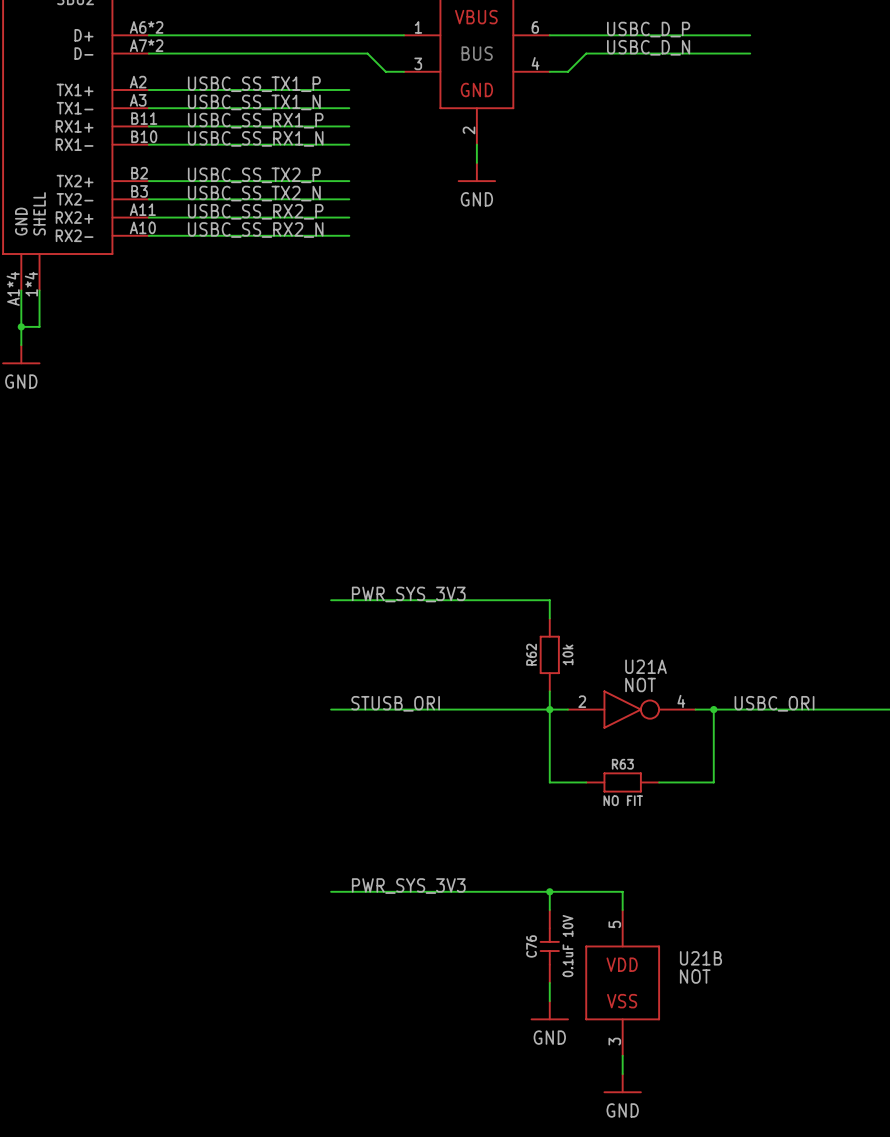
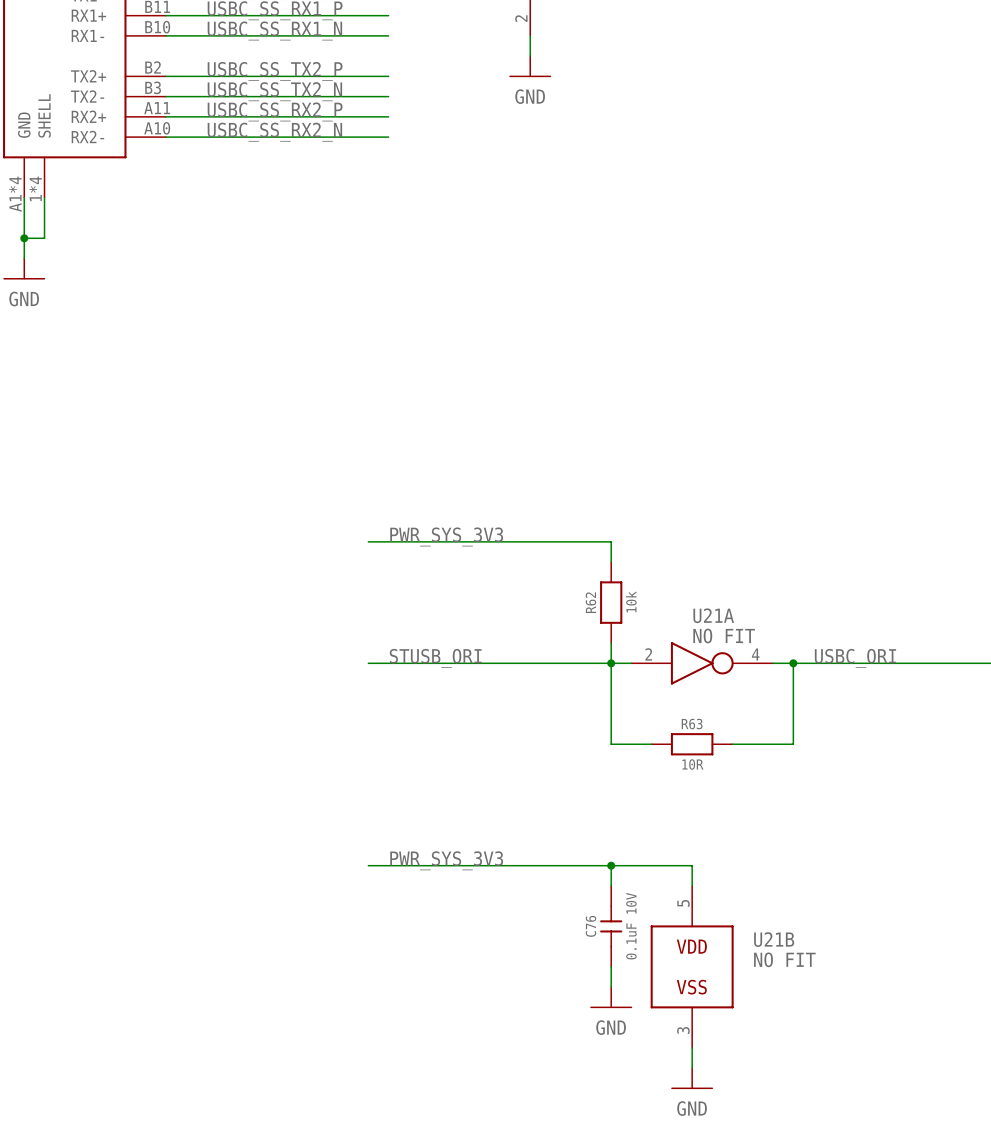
U21A value: NOT (640, 684) -> NO FIT (724, 635)
R63 value: NO FIT (623, 800) -> 10R (692, 764)
U21B value: NOT (695, 976) -> NO FIT (784, 959)

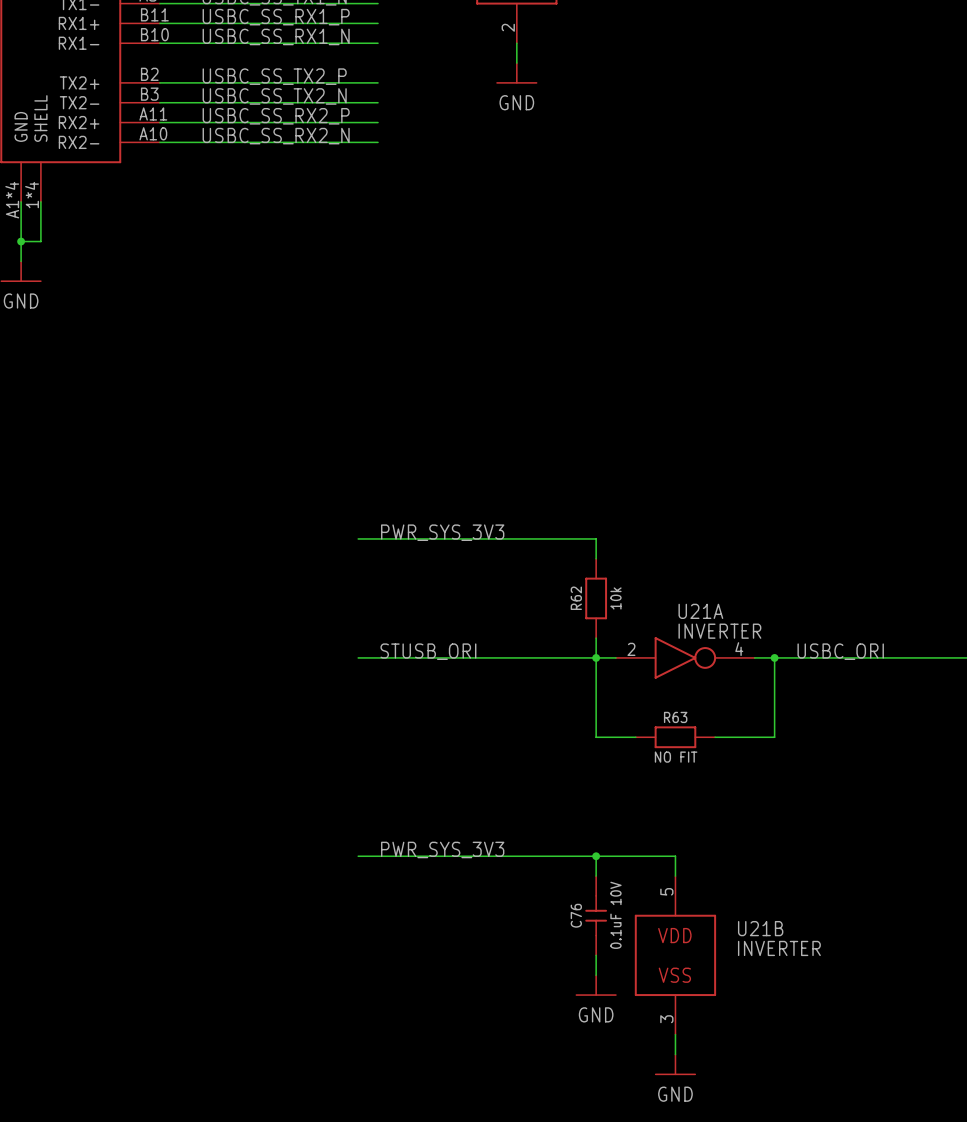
U21A value: NO FIT (724, 635) -> INVERTER (719, 631)
R63 value: 10R (692, 764) -> NO FIT (676, 757)
U21B value: NO FIT (784, 959) -> INVERTER (779, 948)

